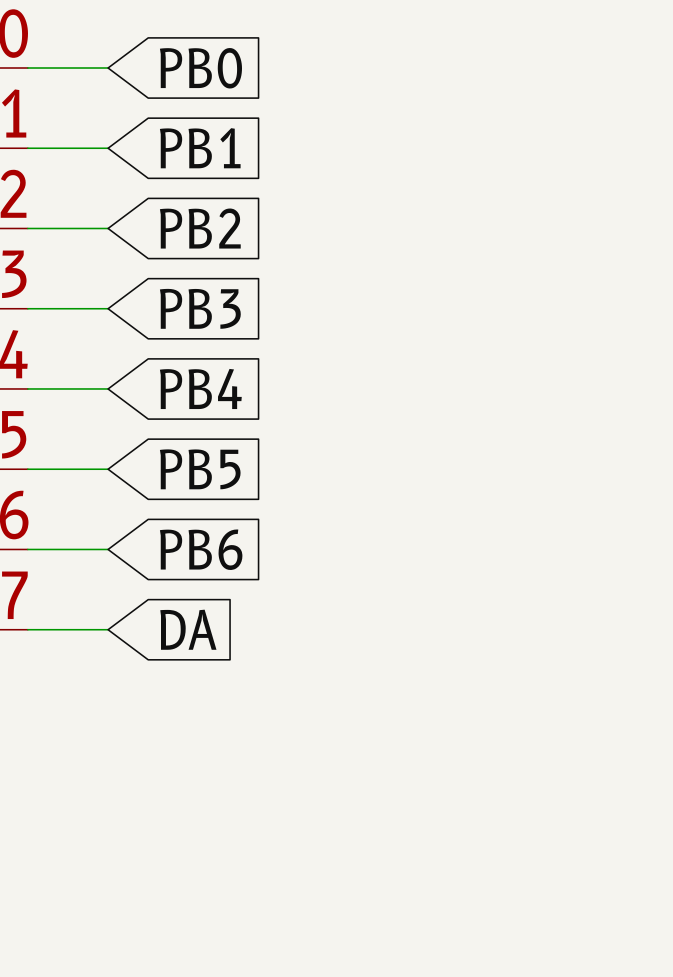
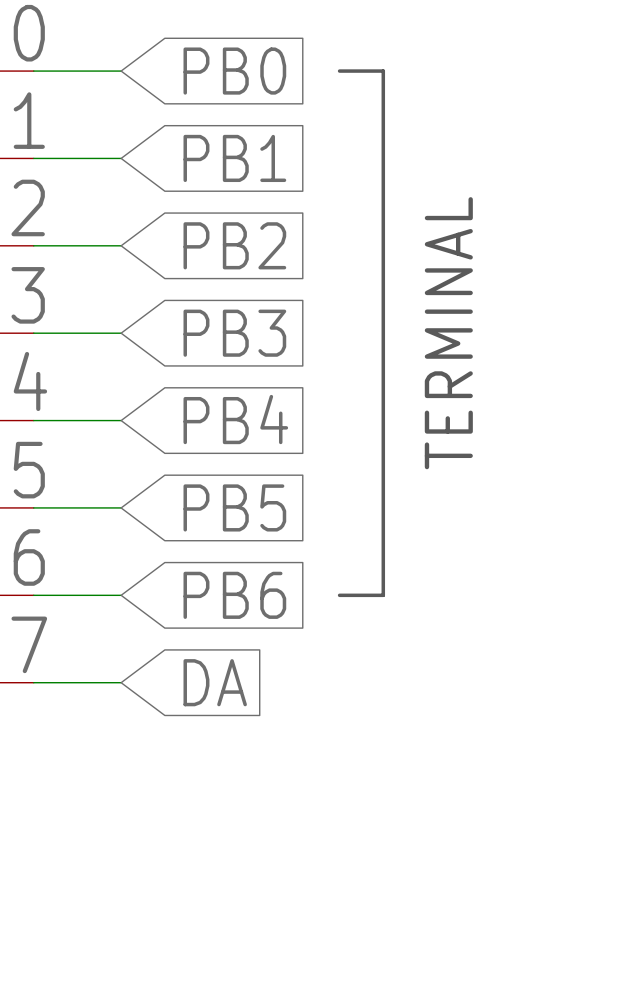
line: none -> (339, 71) (383, 71) (383, 595) (339, 595)
text: none -> TERMINAL (448, 333)

